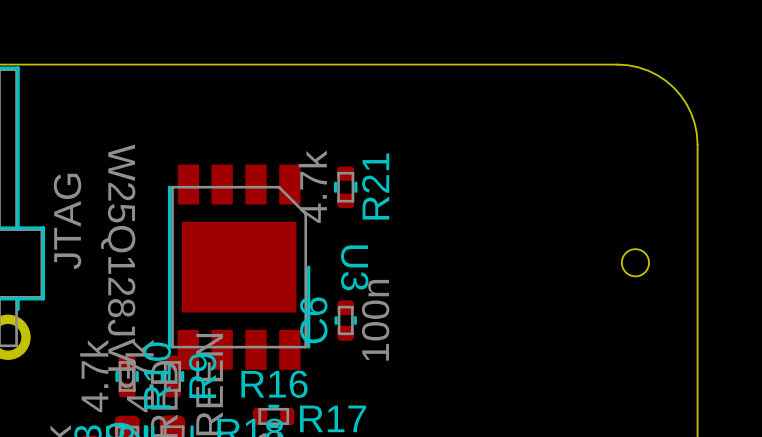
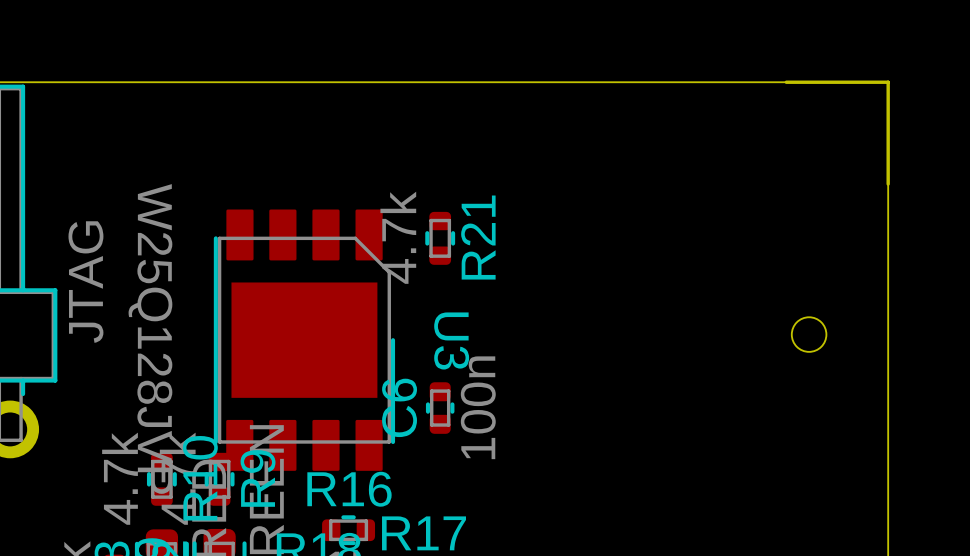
board edge: (617, 64) (648, 70) (674, 88) (691, 113) (697, 144) -> (786, 82) (888, 82) (888, 184)

